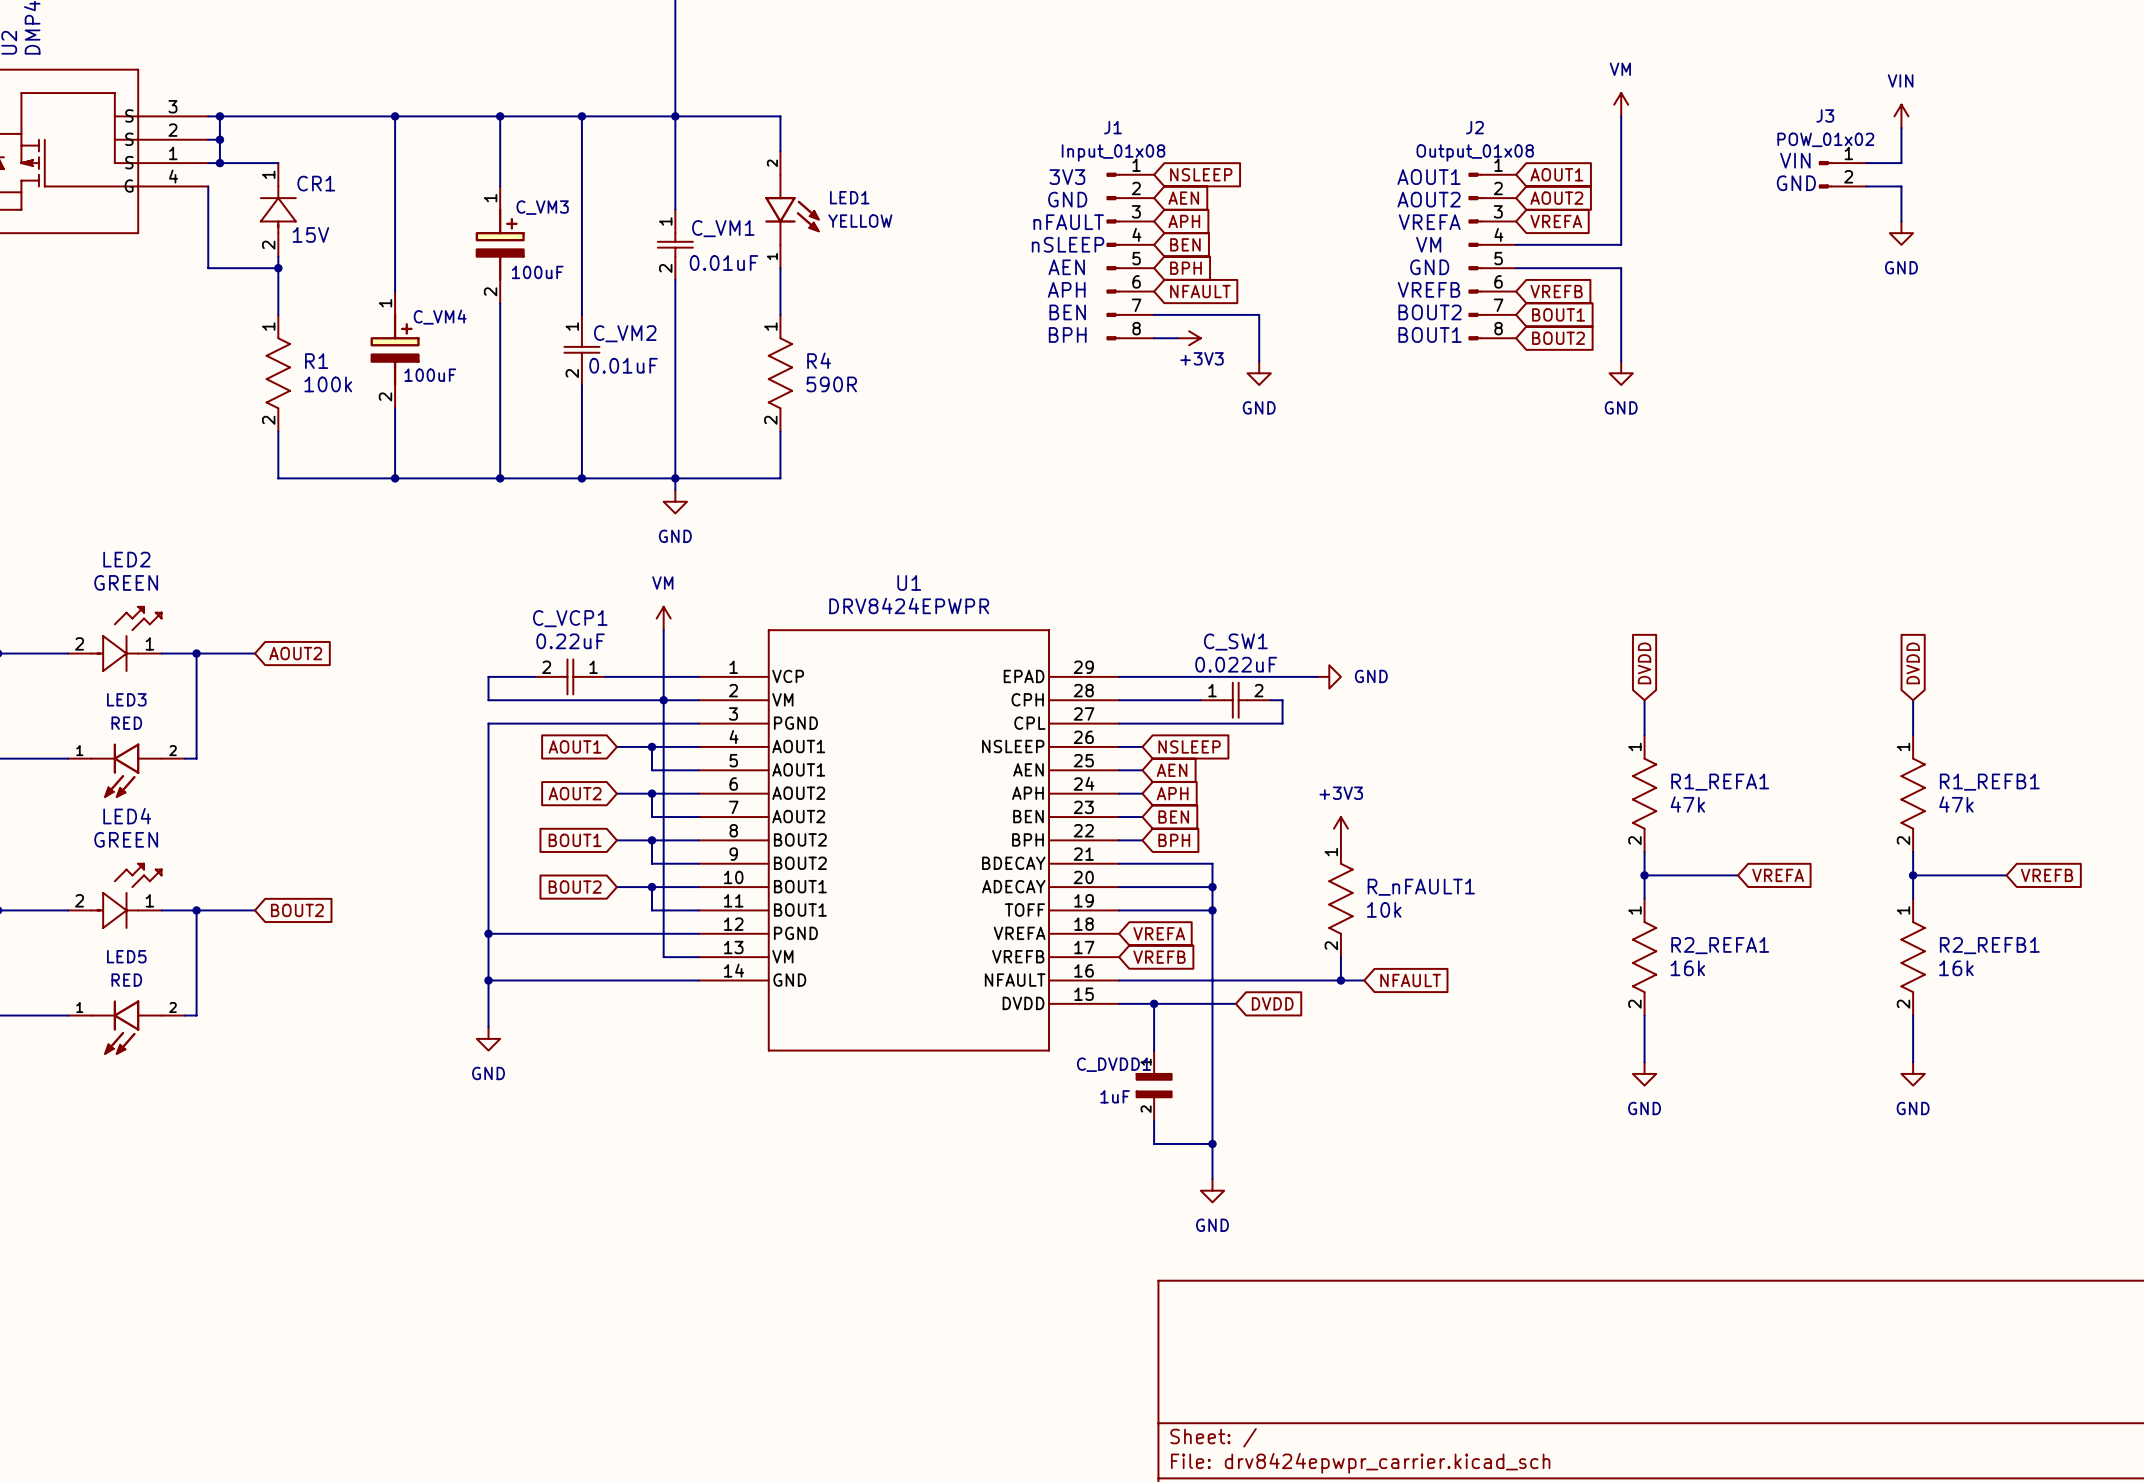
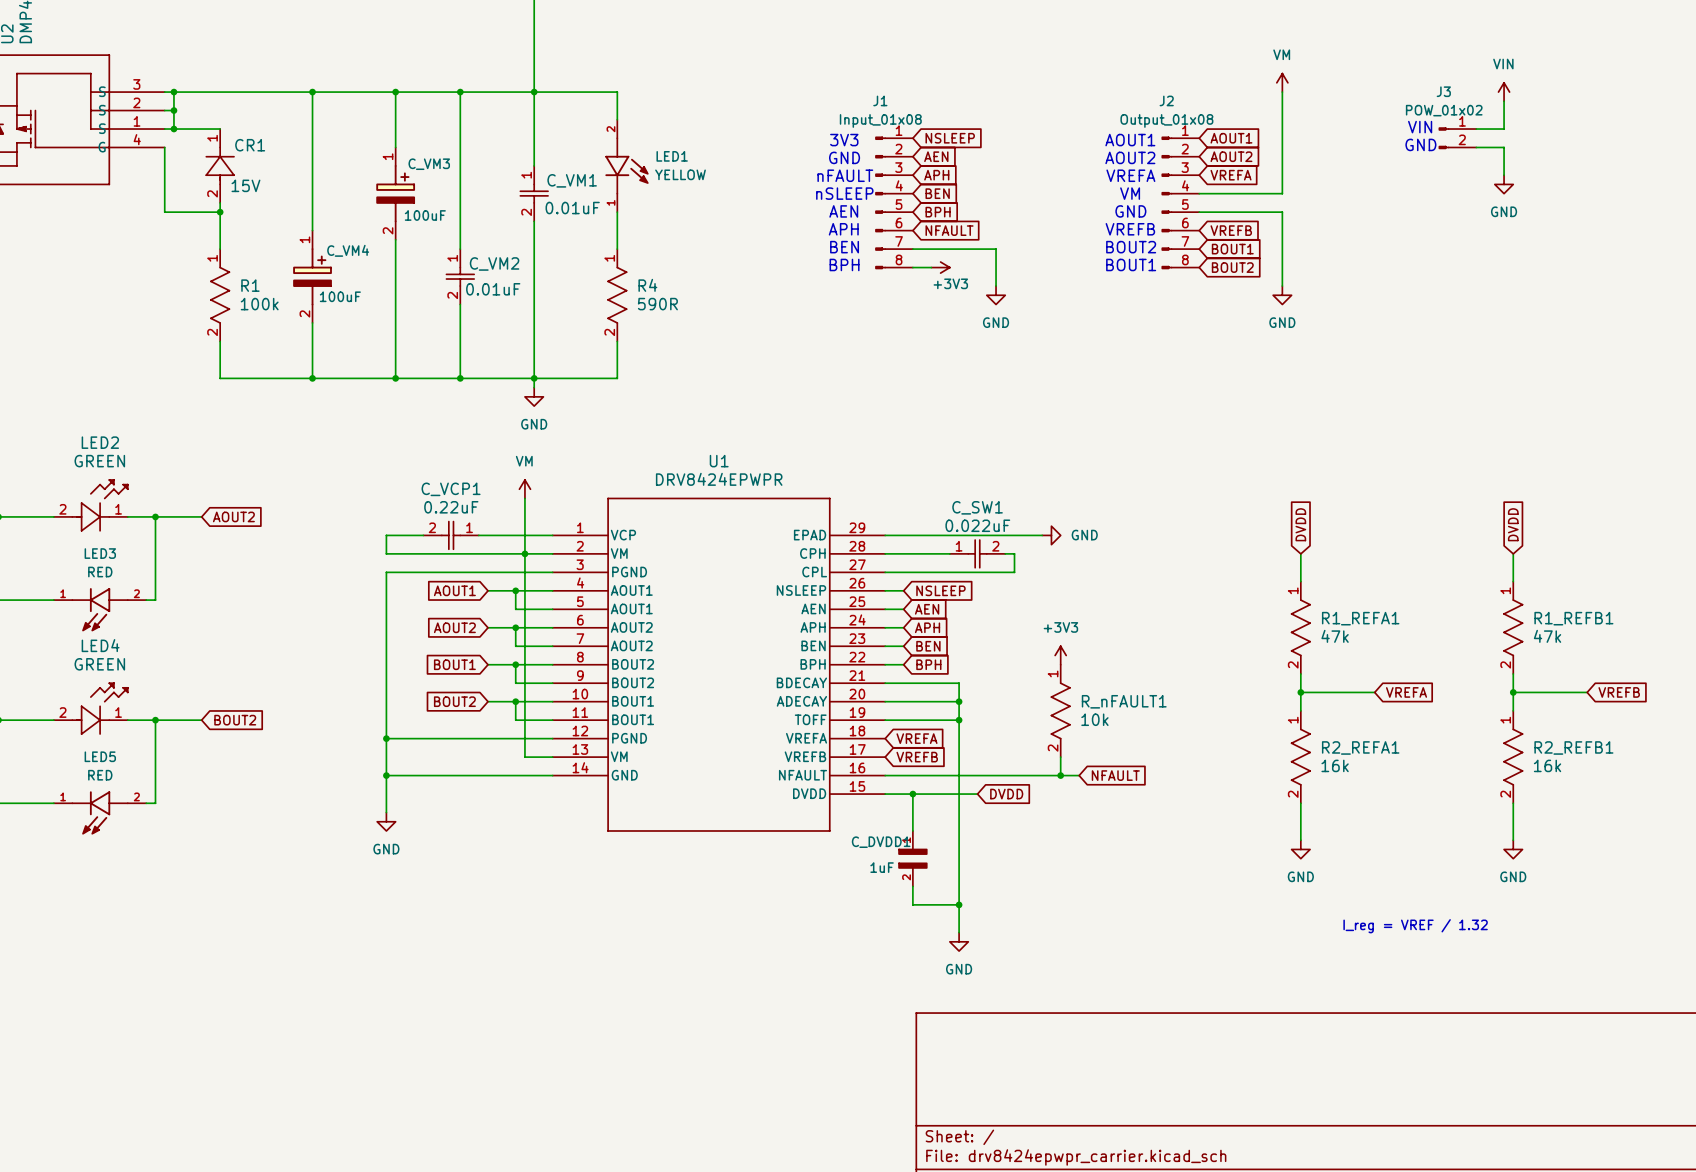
text: none -> I_reg = VREF / 1.32 (1415, 926)

